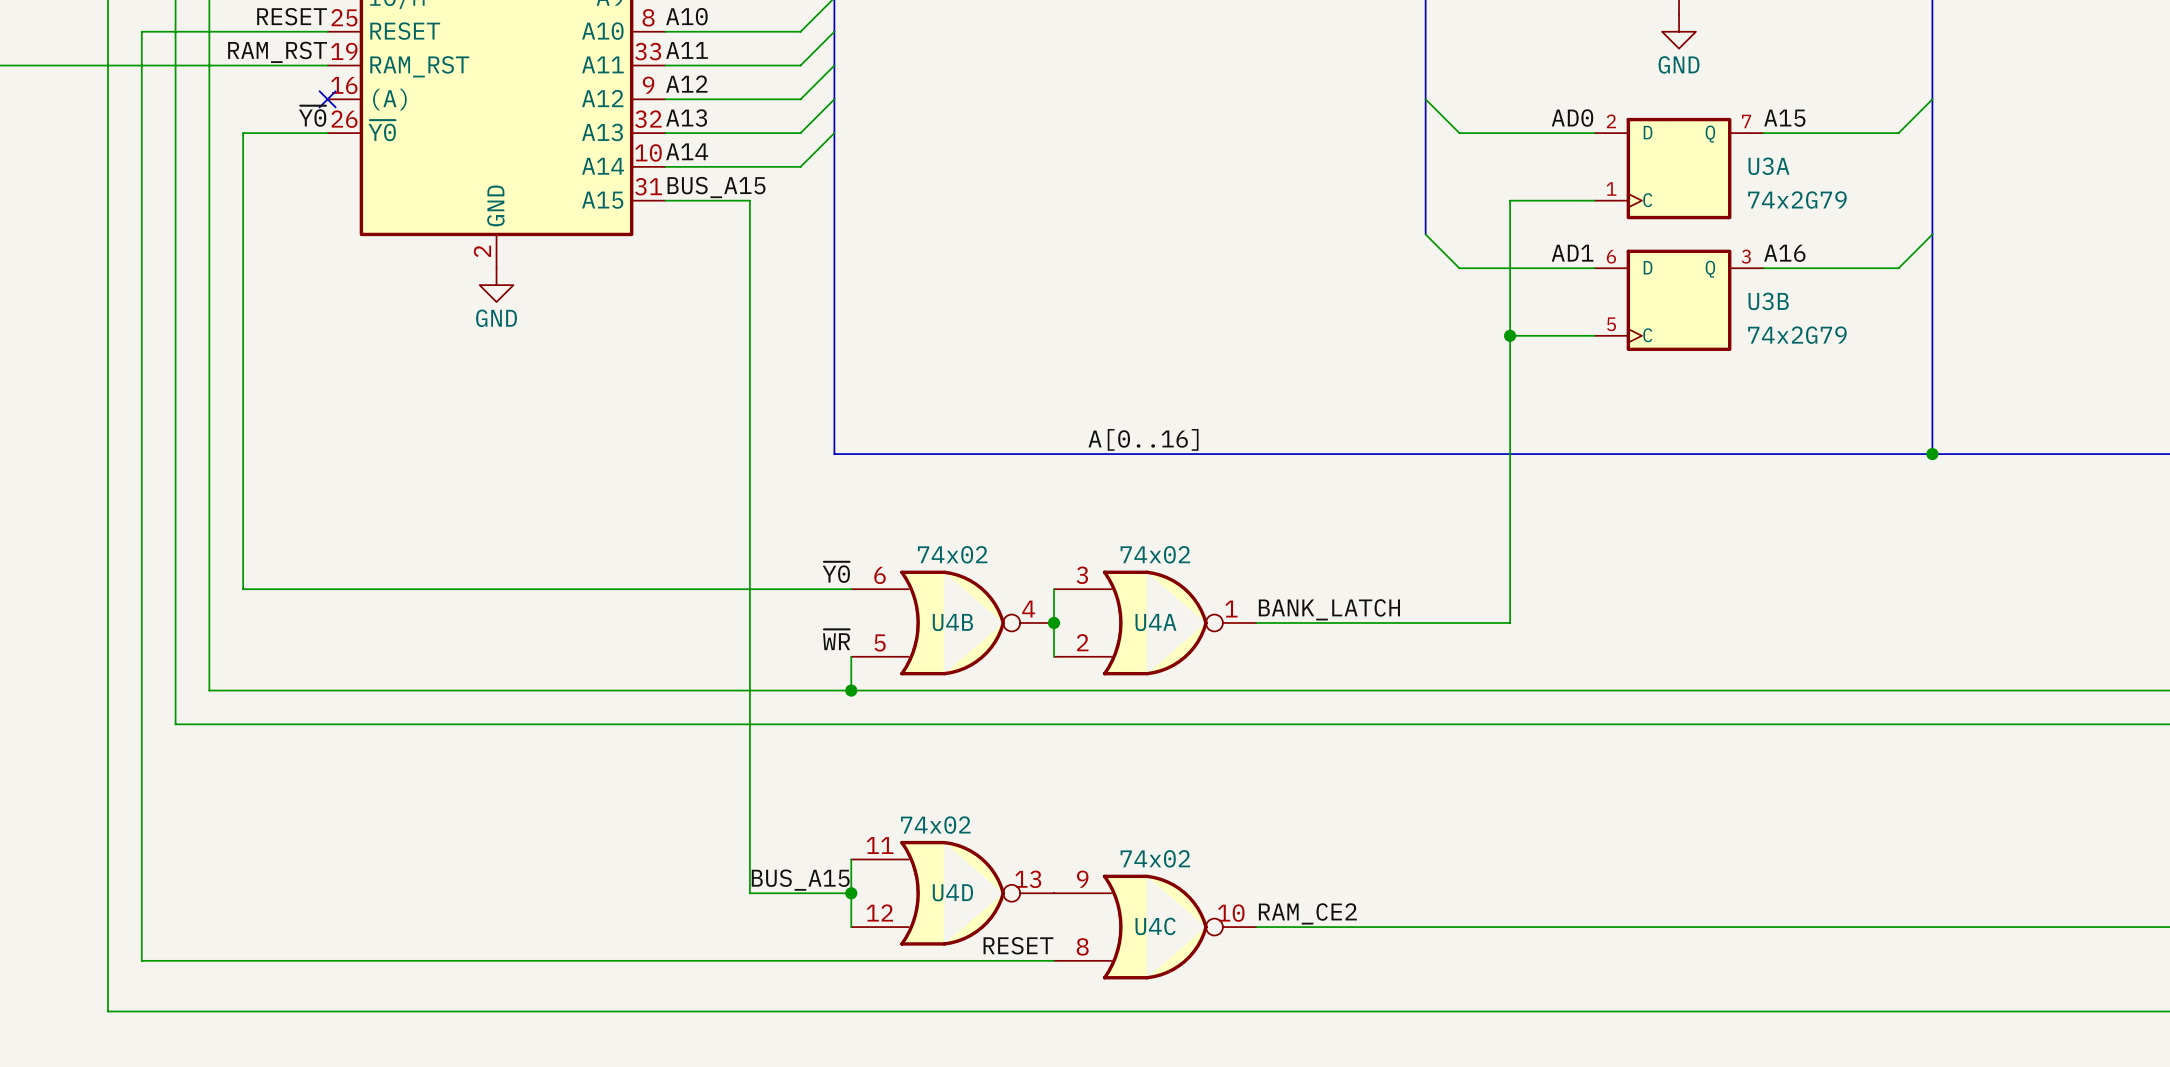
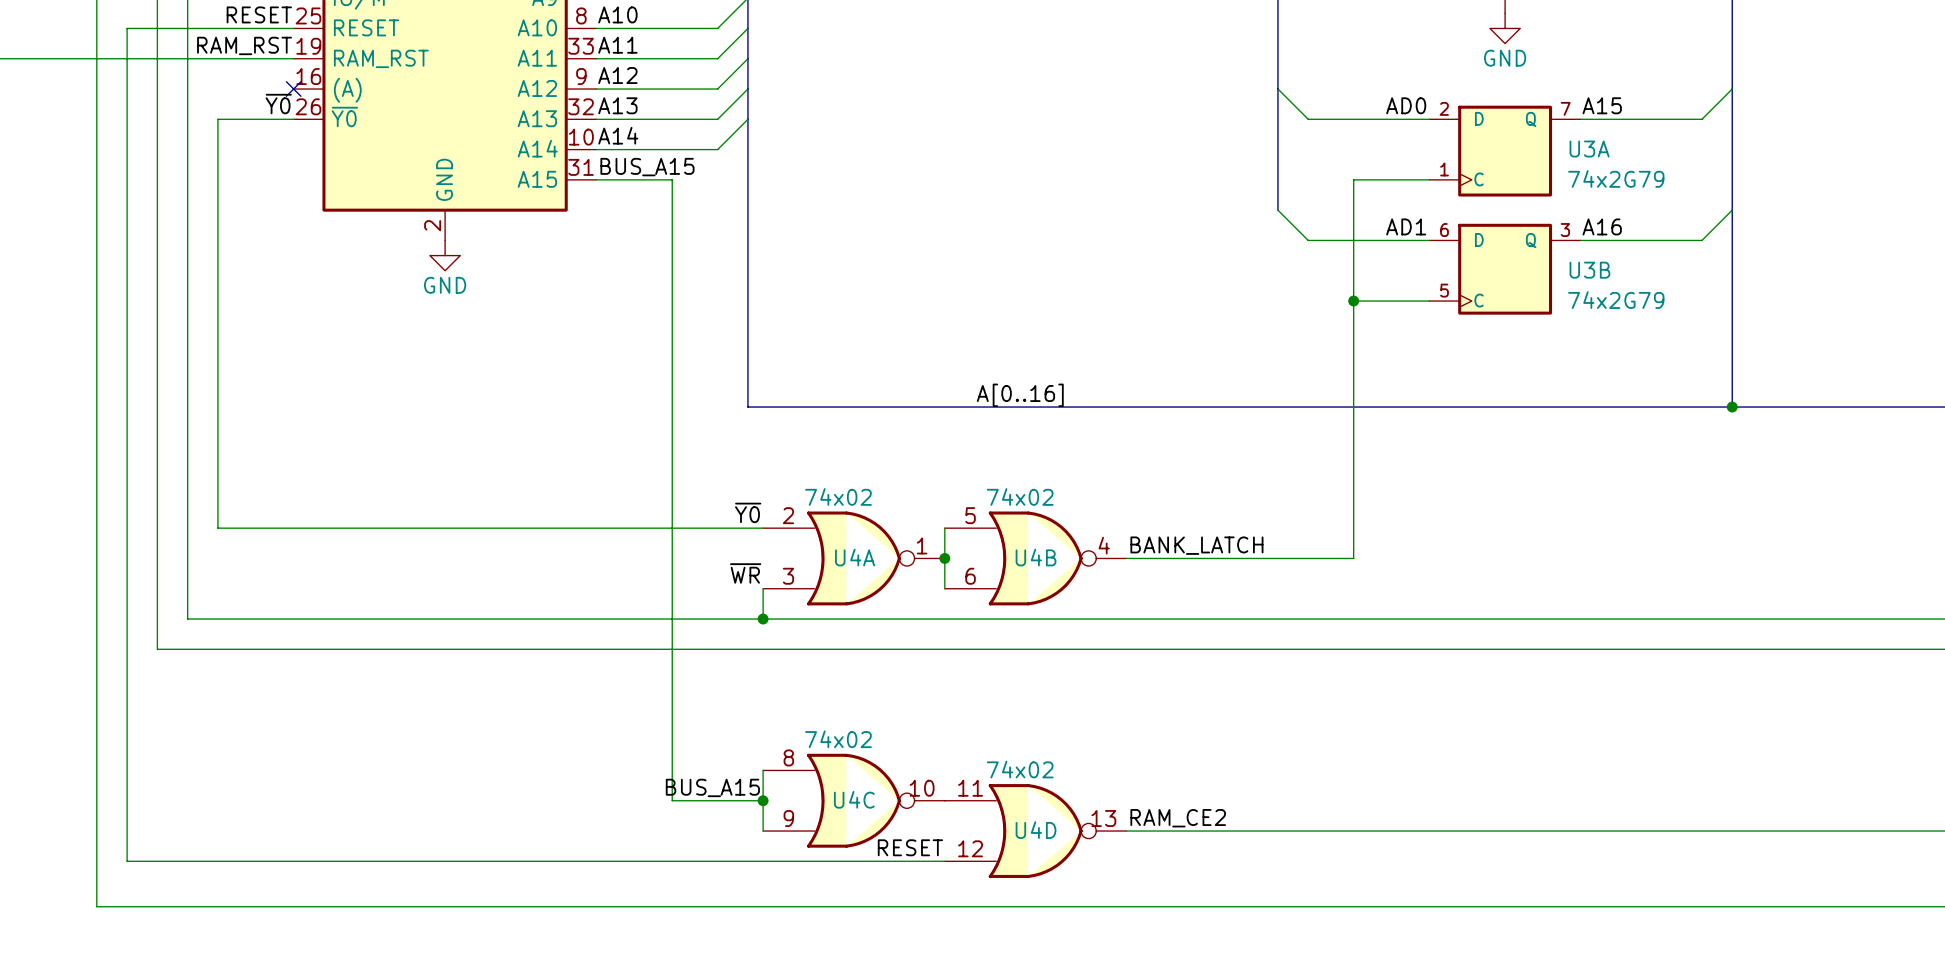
U4B flip: as is (952, 622) -> up-down (1035, 558)
U4B position: (952, 622) -> (1035, 558)
U4A flip: as is (1155, 622) -> up-down (853, 558)
U4A position: (1155, 622) -> (853, 558)
U4D position: (952, 893) -> (1035, 831)
U4C flip: as is (1155, 927) -> up-down (853, 800)
U4C position: (1155, 927) -> (853, 800)

